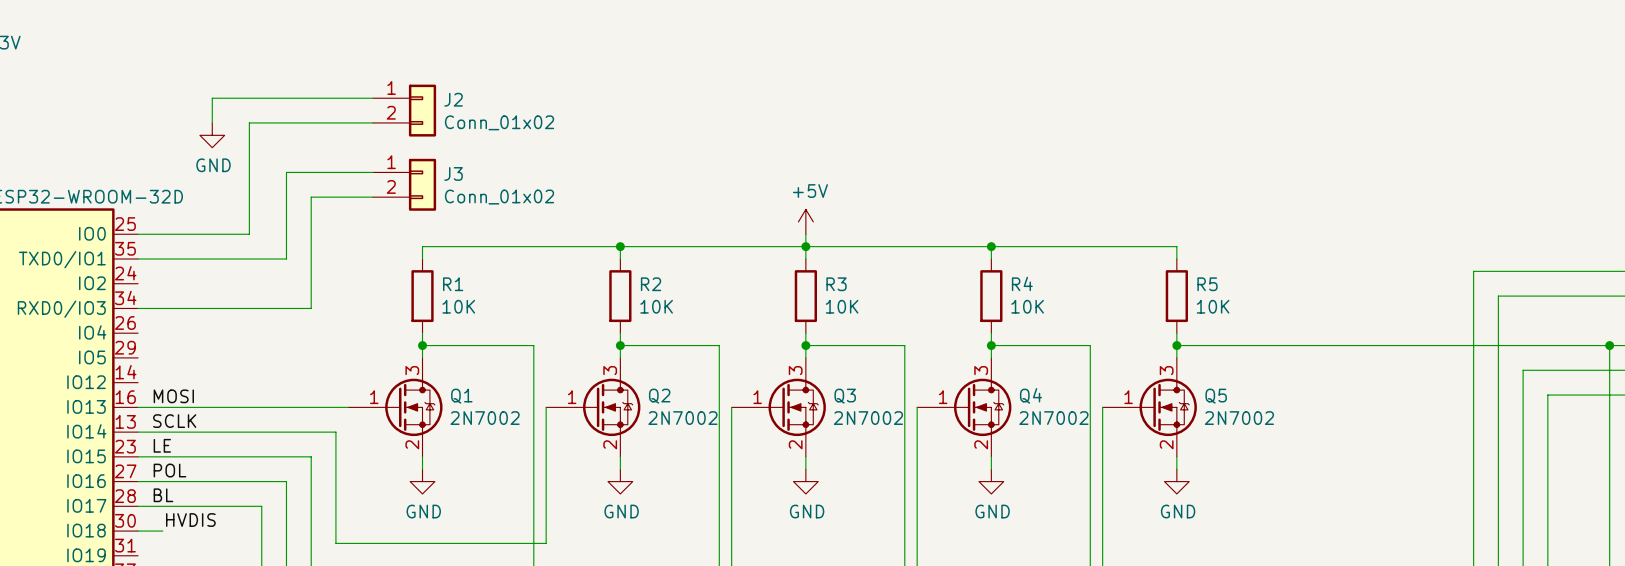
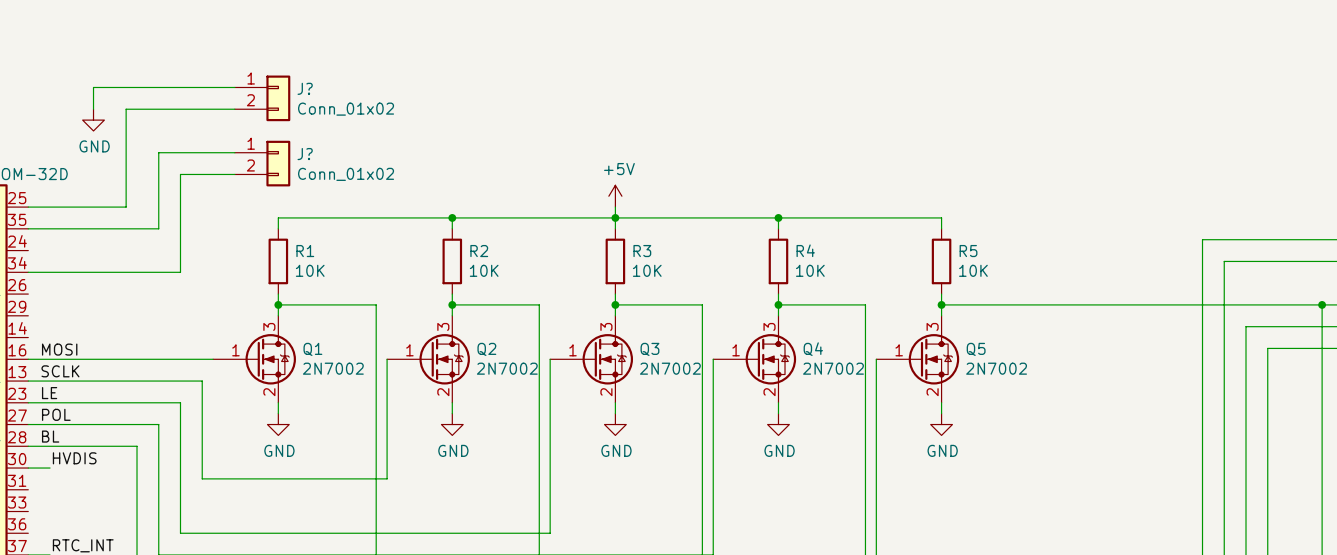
J2 name: J2 (453, 99) -> J? (305, 88)
J3 name: J3 (453, 173) -> J? (305, 154)

